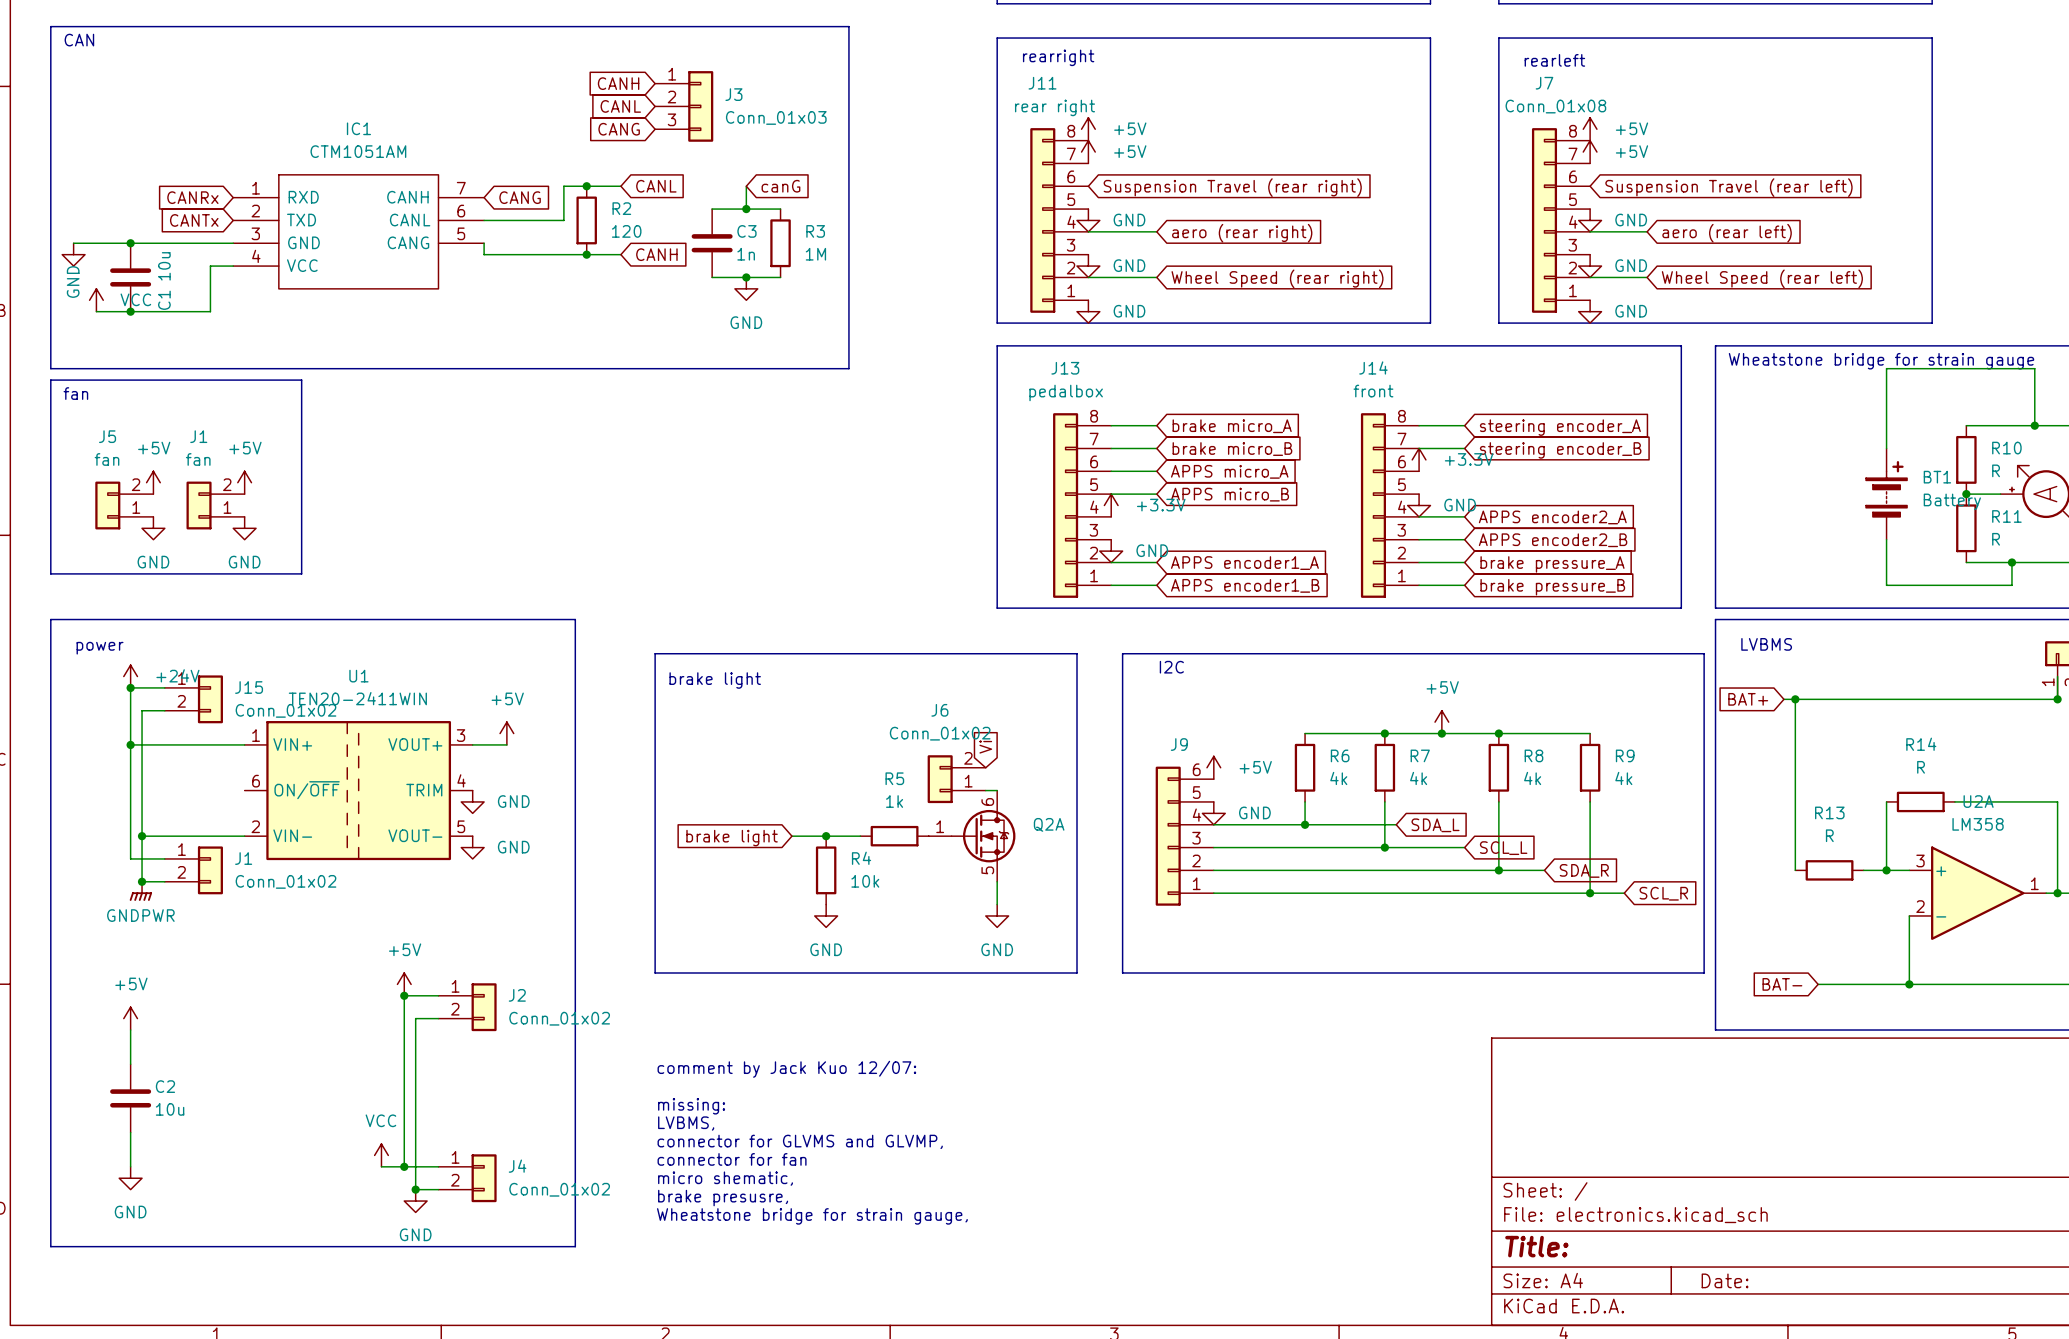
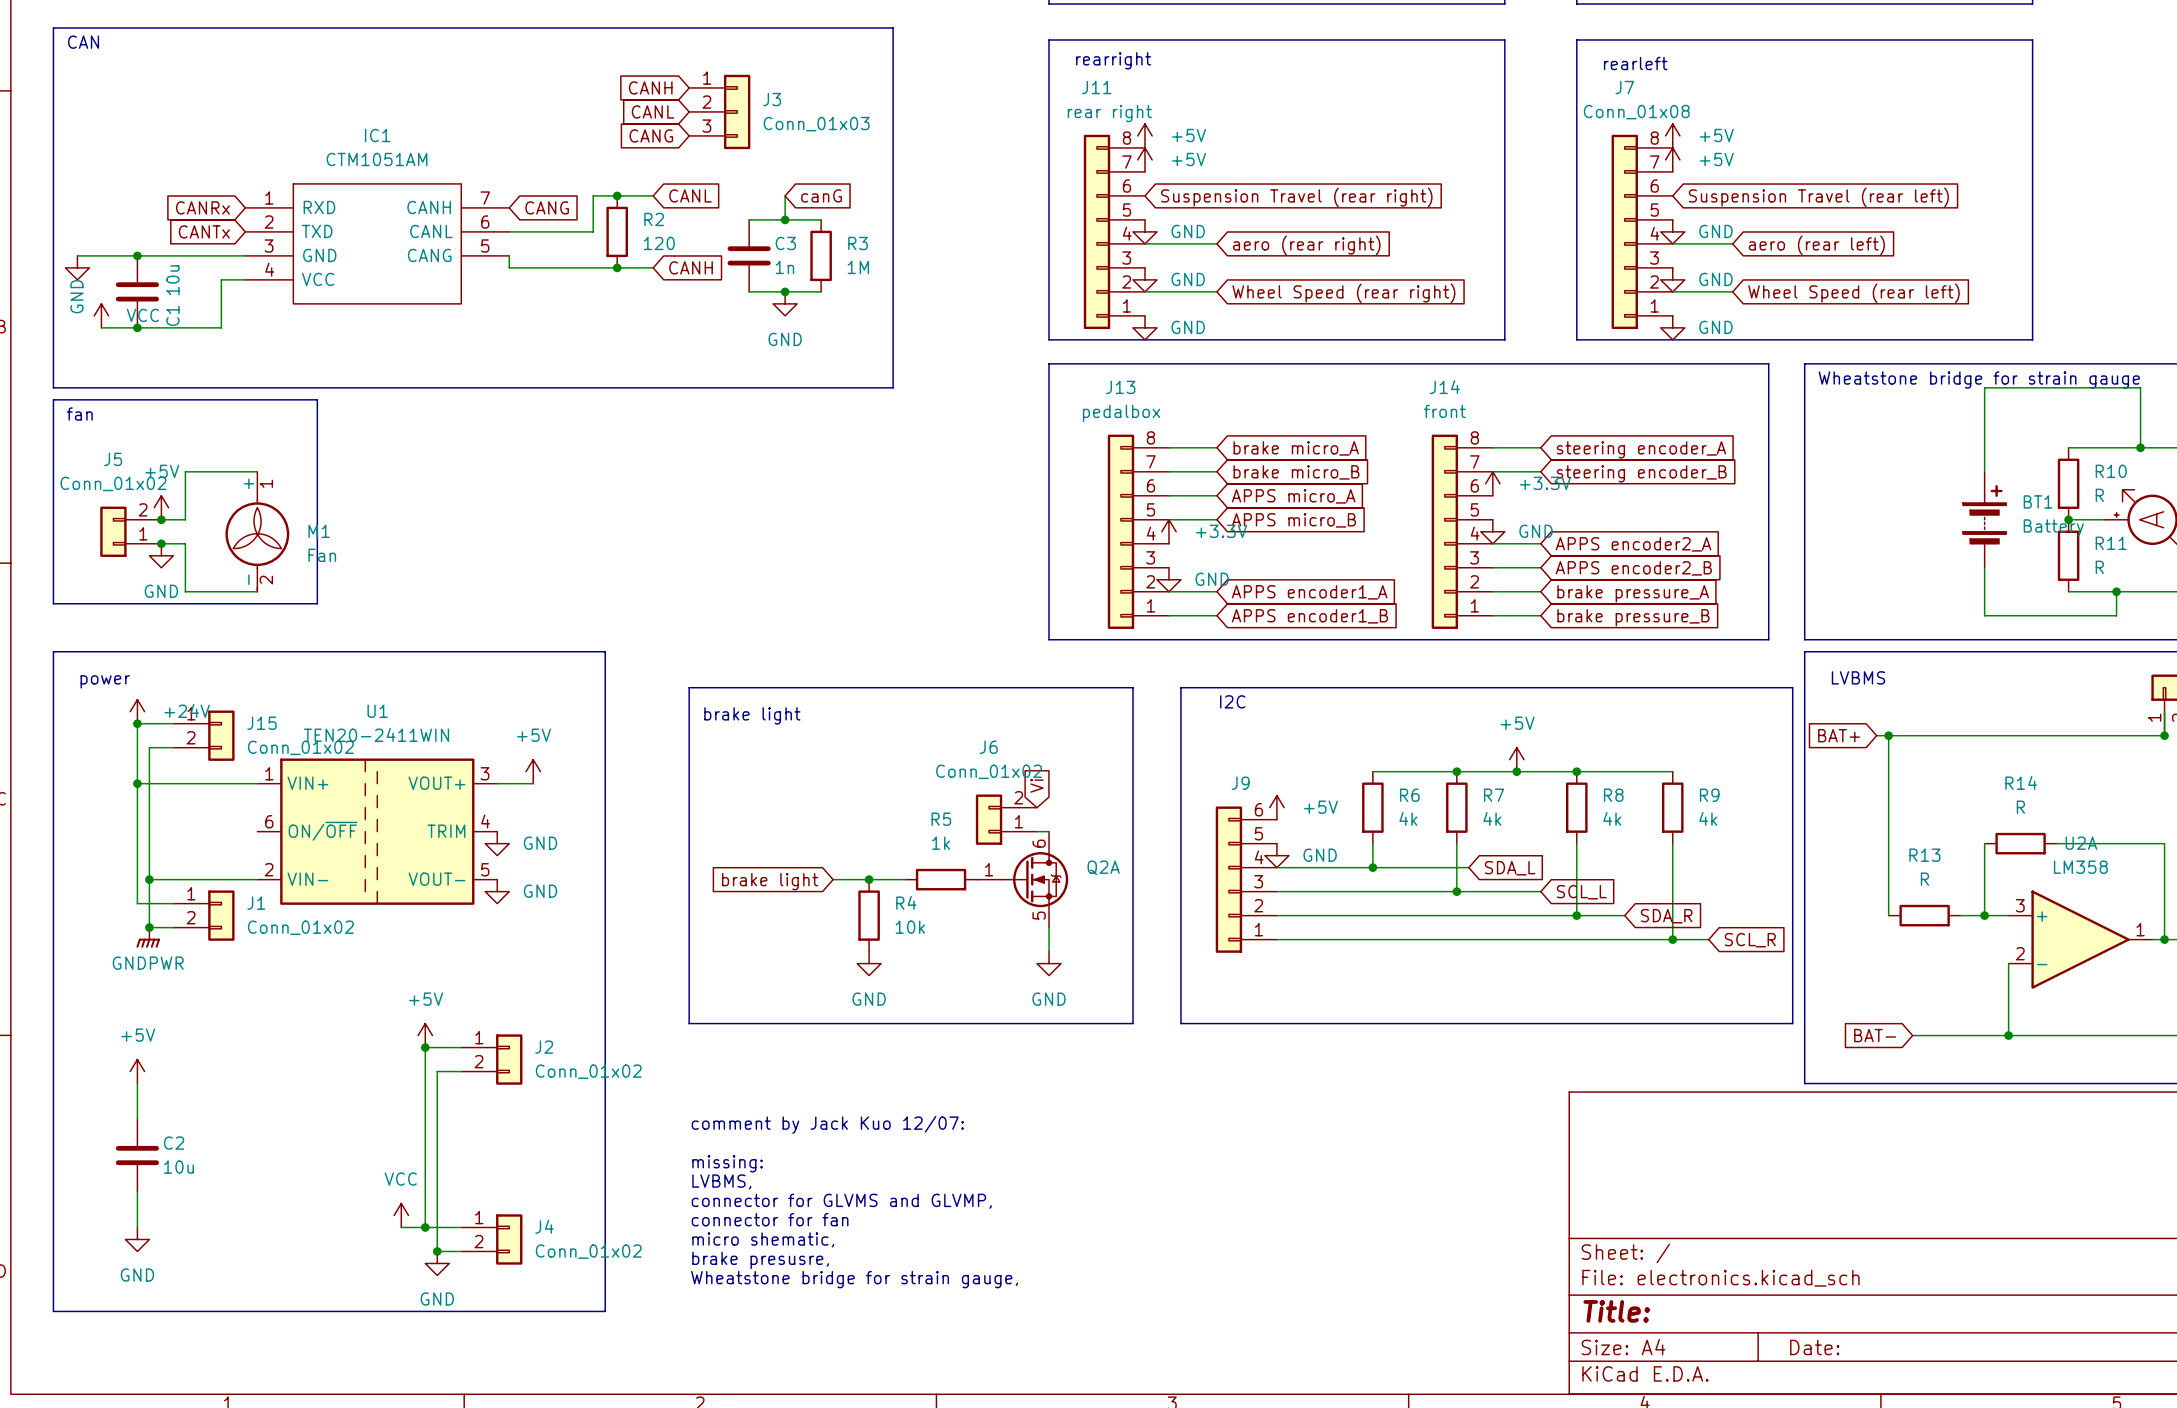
wire: none -> (257, 471) (185, 471) (185, 519) (161, 519)
J5 value: fan (107, 459) -> Conn_01x02 (113, 483)
power symbol: +5V (244, 482) -> none
junction: none -> (161, 519)
J1: fan (215, 505) -> none
M1: none -> Fan (257, 531)
wire: none -> (161, 543) (185, 543) (185, 591) (257, 591)
junction: none -> (161, 543)
power symbol: GND (244, 528) -> none

